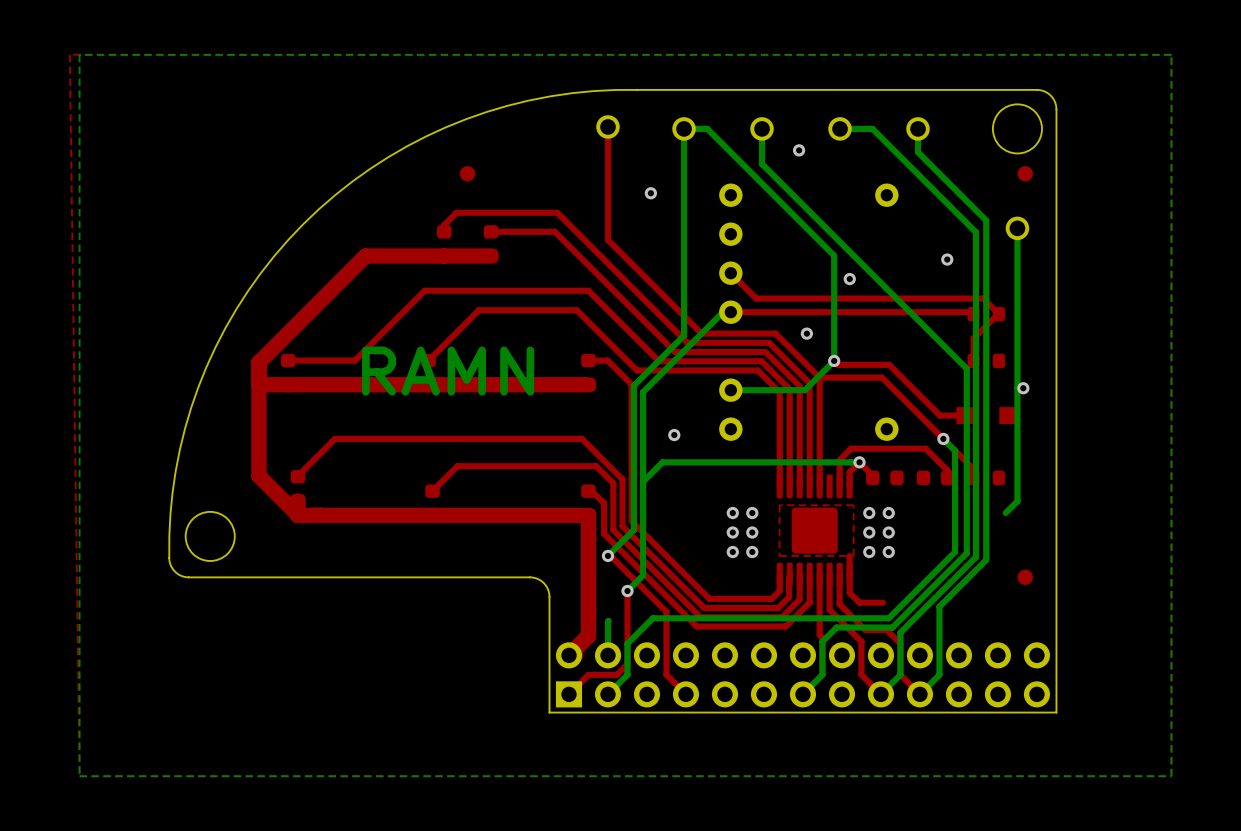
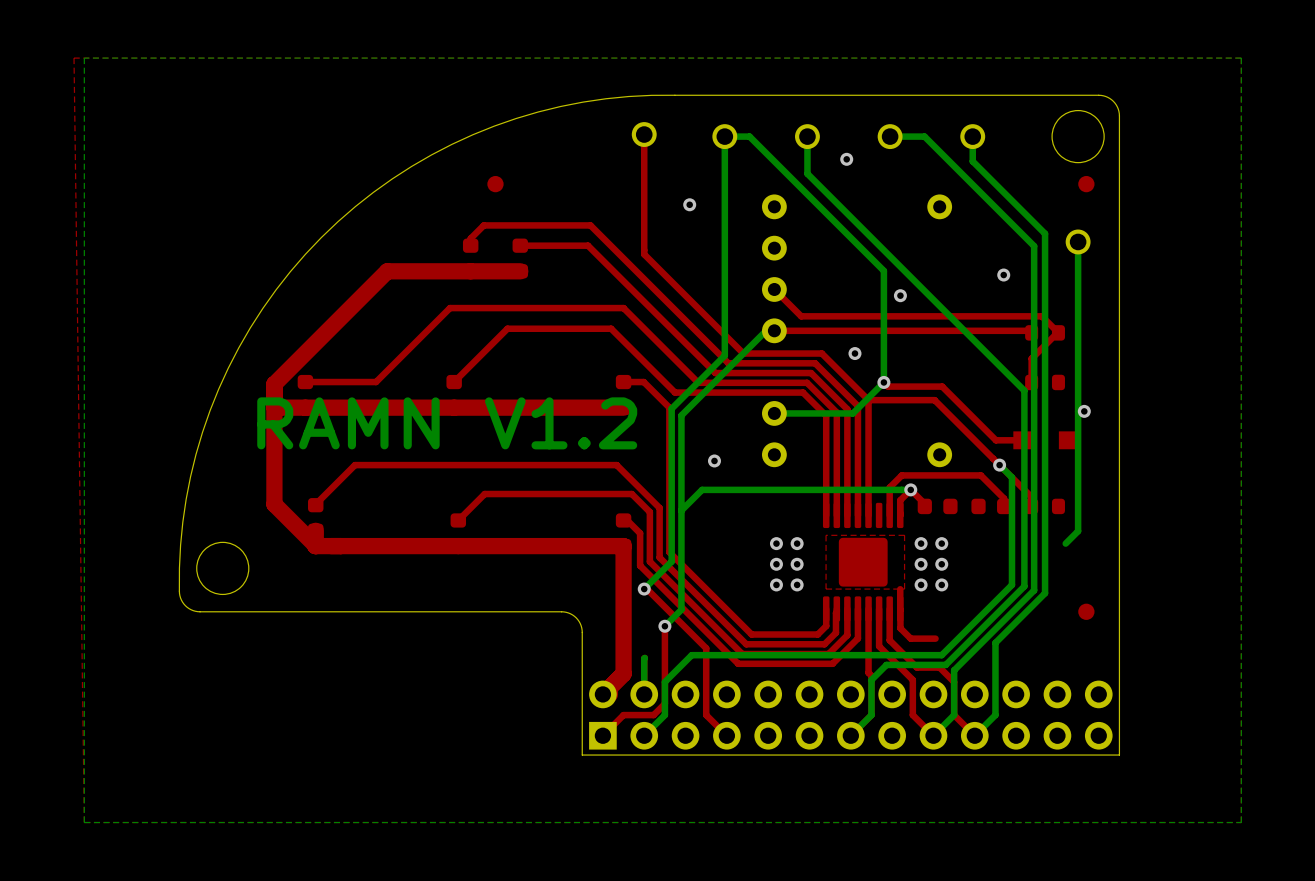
text: RAMN (448, 371) -> RAMN V1.2 (447, 423)

